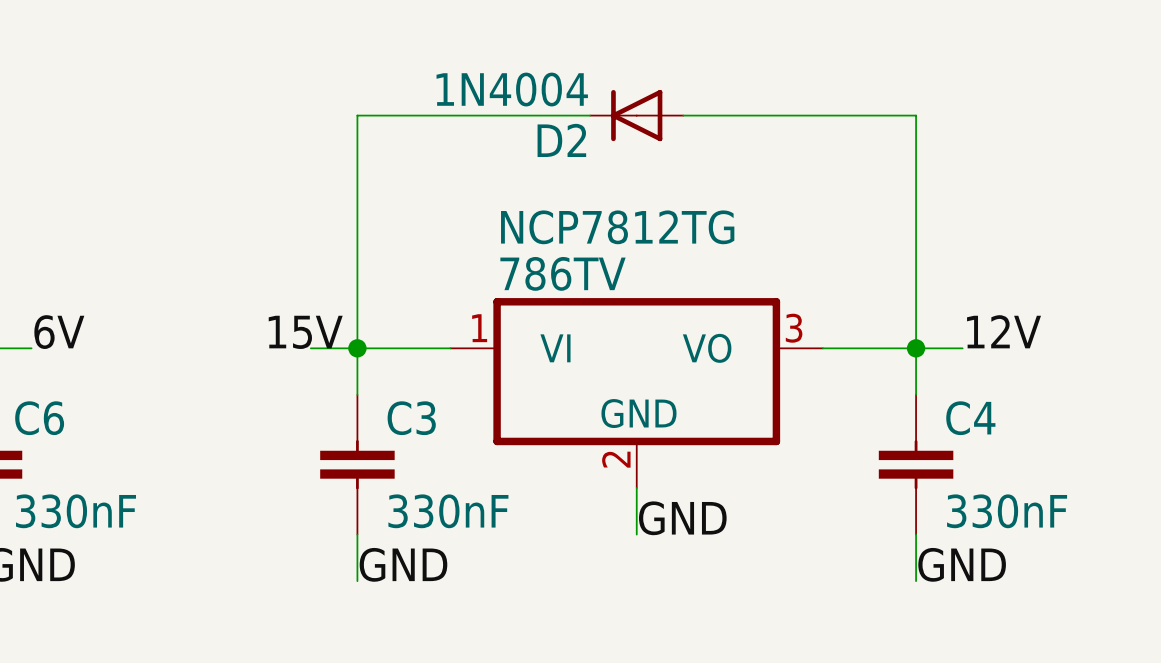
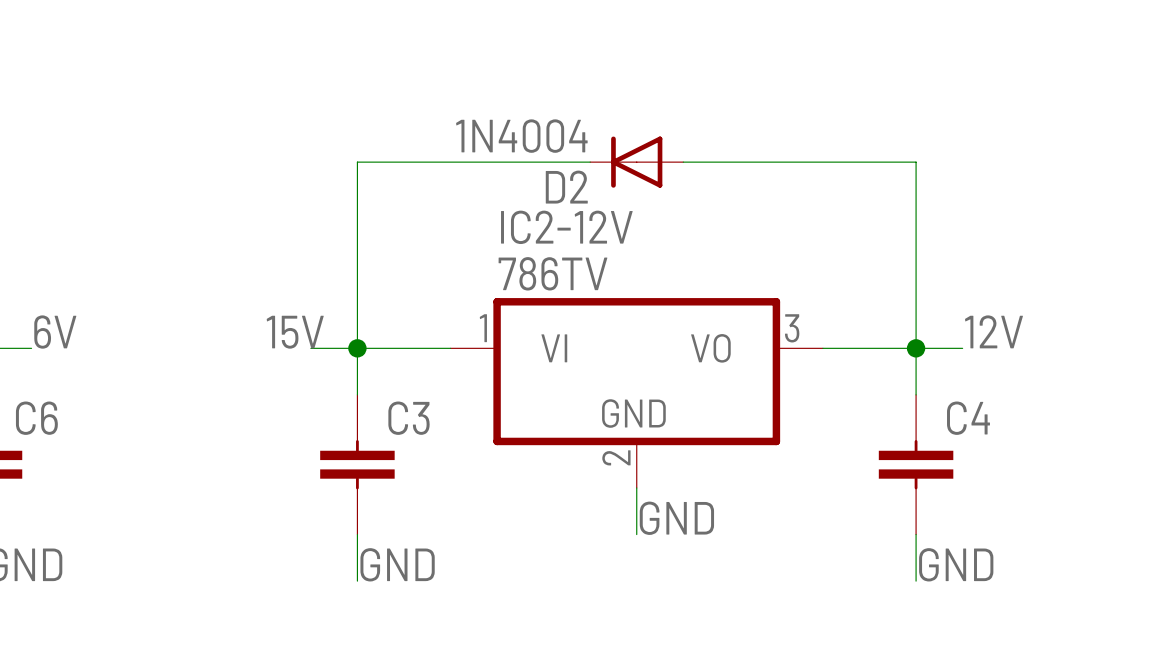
wire: (590, 115) (357, 115) (357, 162) -> (590, 162) (357, 162)
D2 position: (636, 115) -> (636, 162)
wire: (683, 115) (916, 115) (916, 162) -> (683, 162) (916, 162)
NCP7812TG name: NCP7812TG (617, 227) -> IC2-12V (566, 227)
C6 value: 330nF (76, 511) -> none
C3 value: 330nF (448, 511) -> none
C4 value: 330nF (1007, 511) -> none

